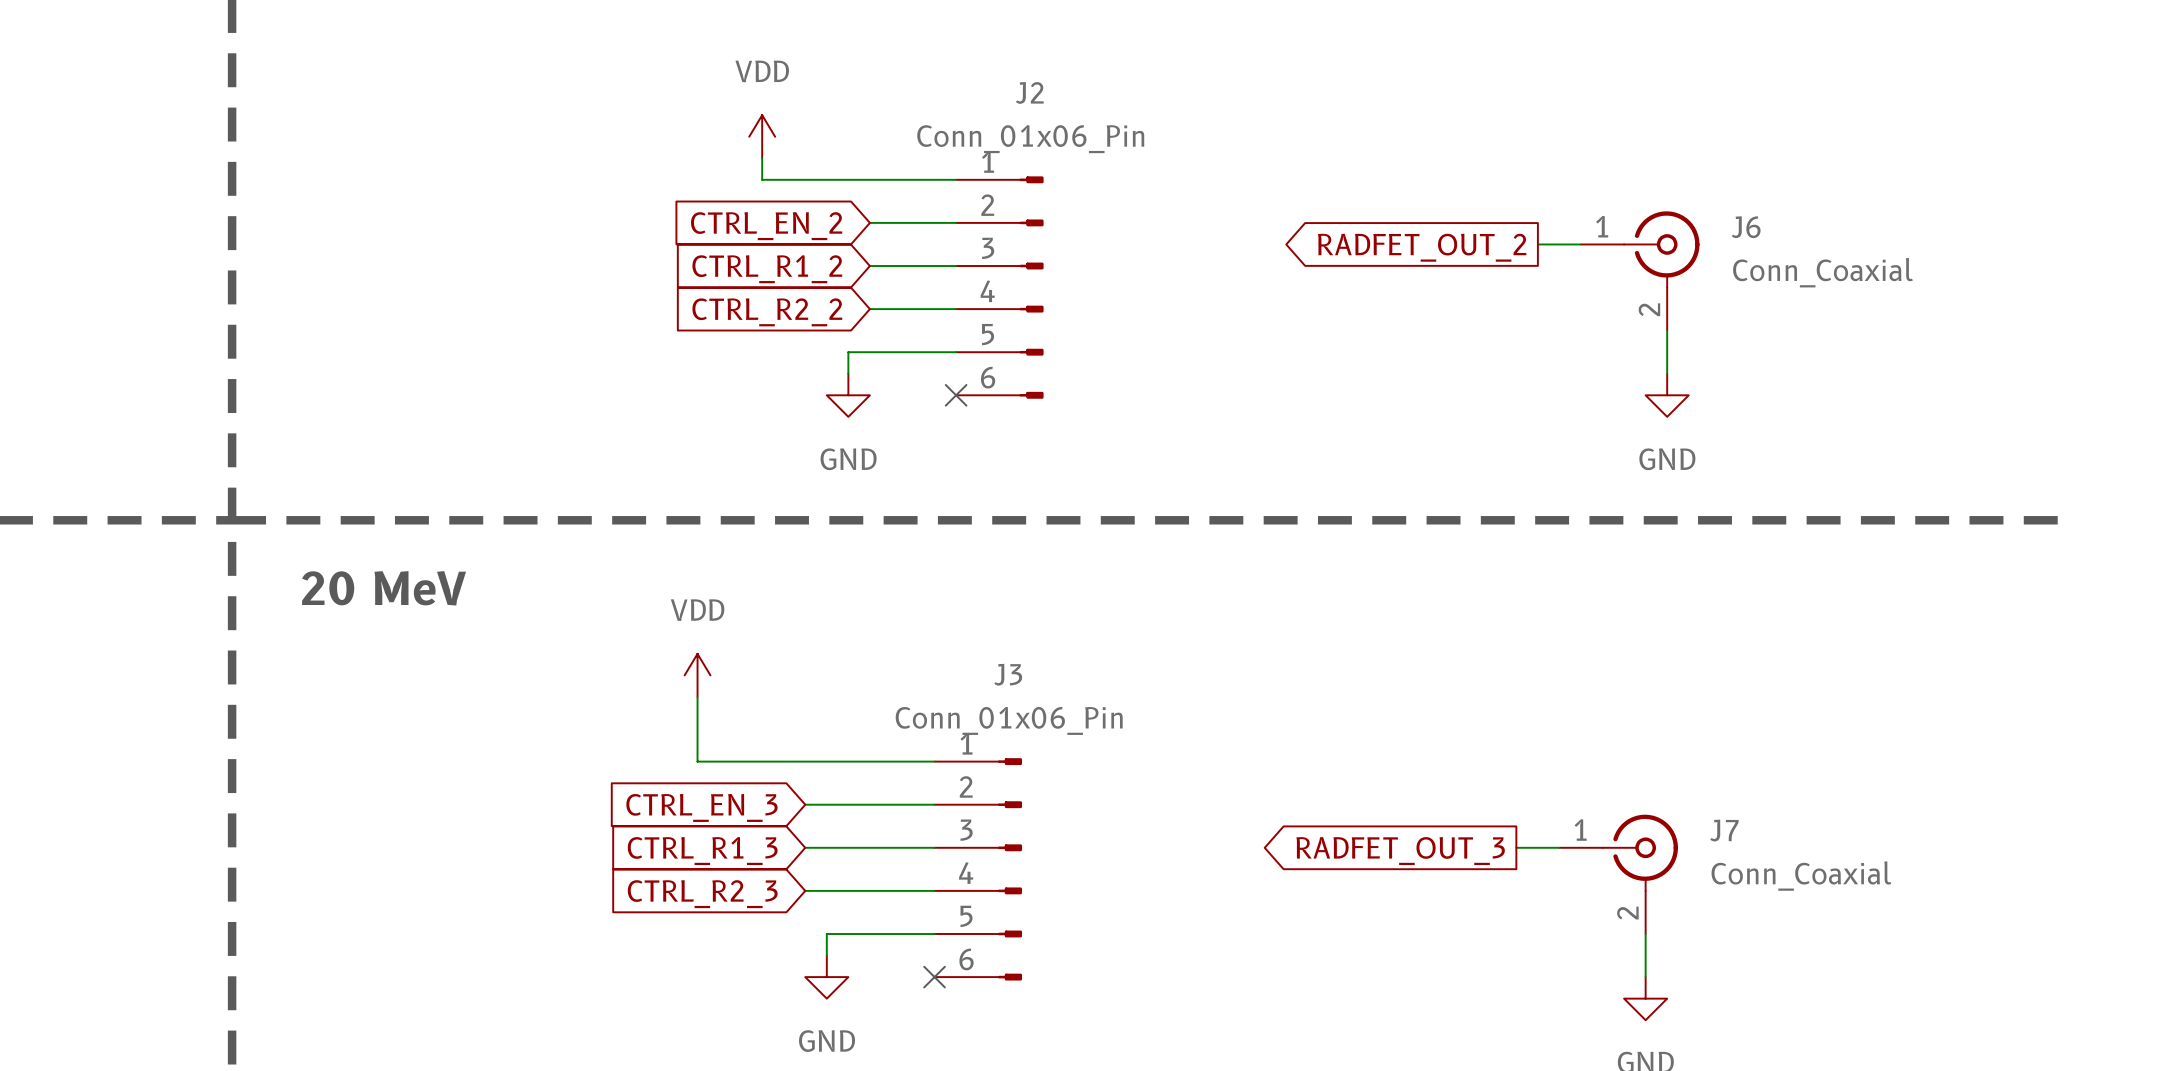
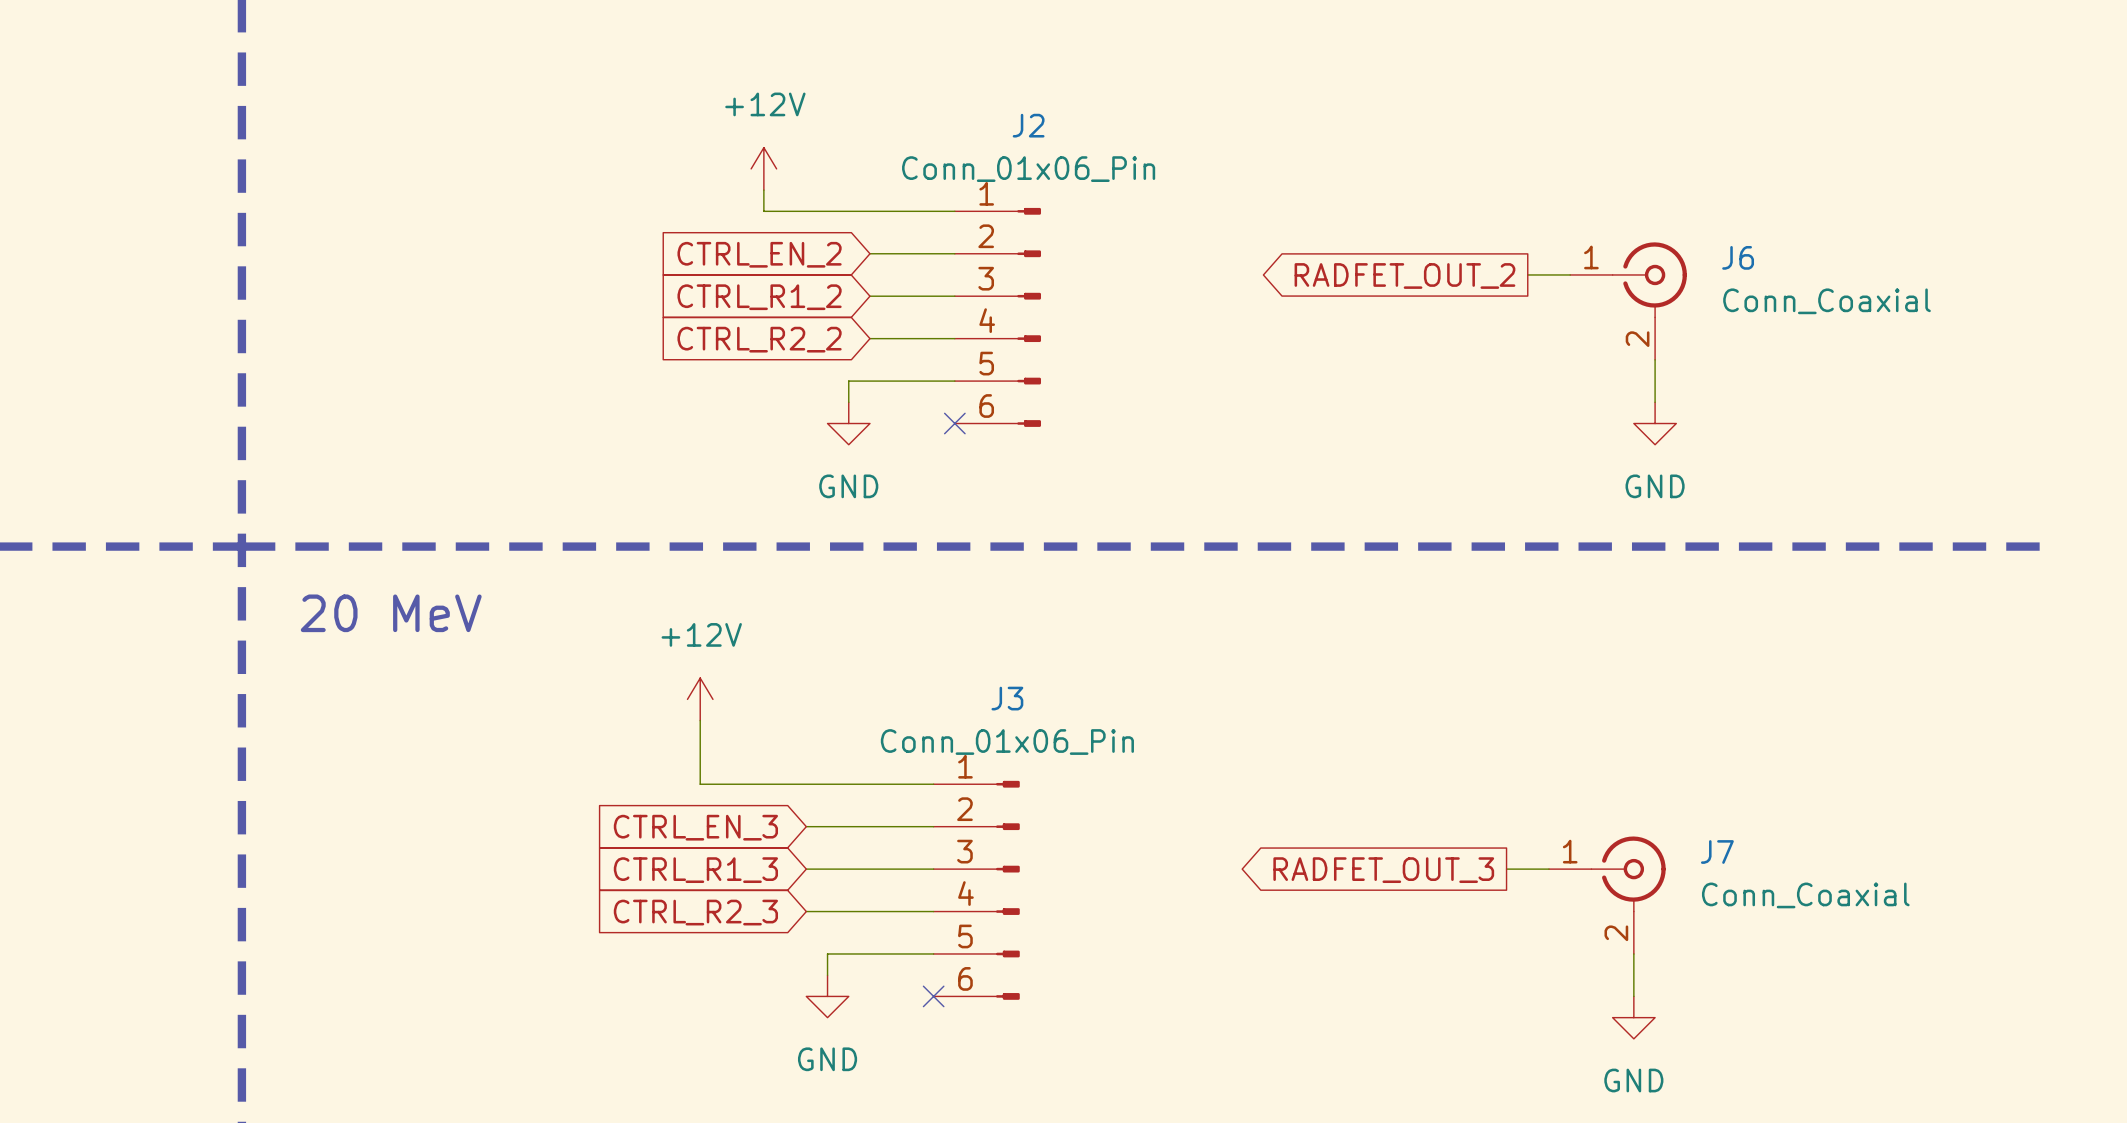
power symbol: VDD (762, 136) -> +12V (763, 168)
power symbol: VDD (697, 675) -> +12V (700, 699)

